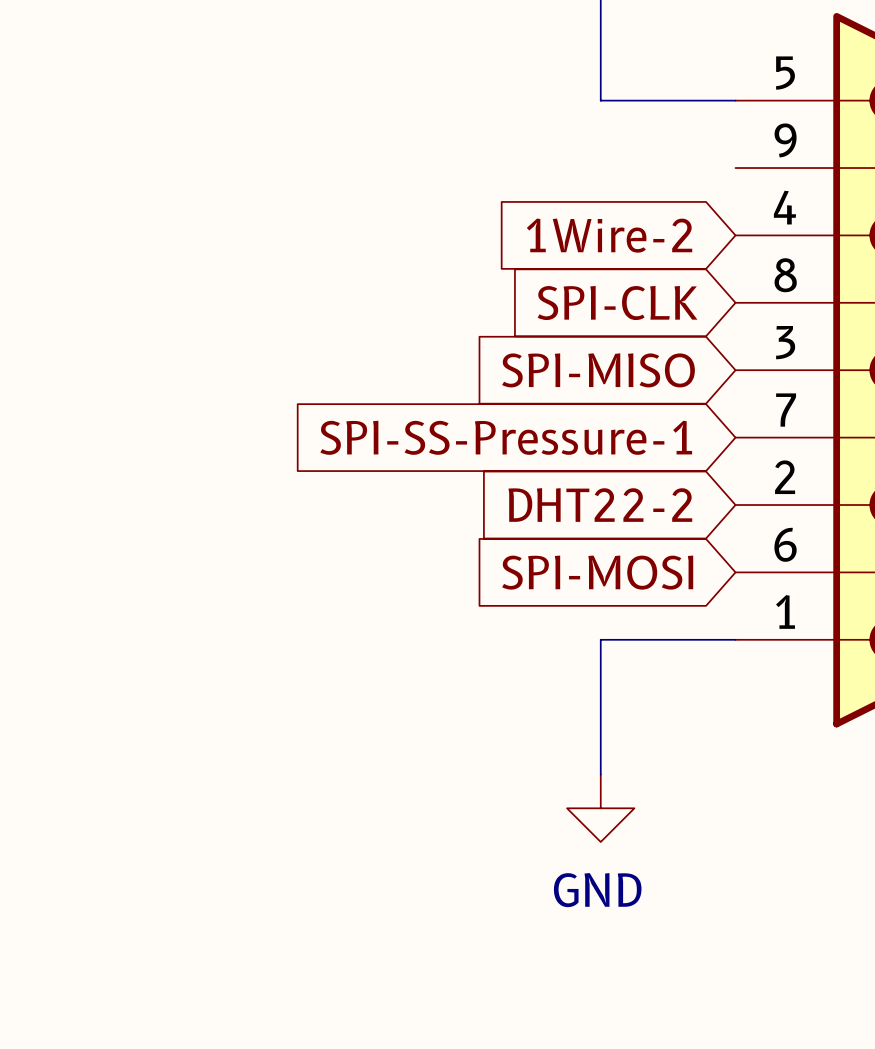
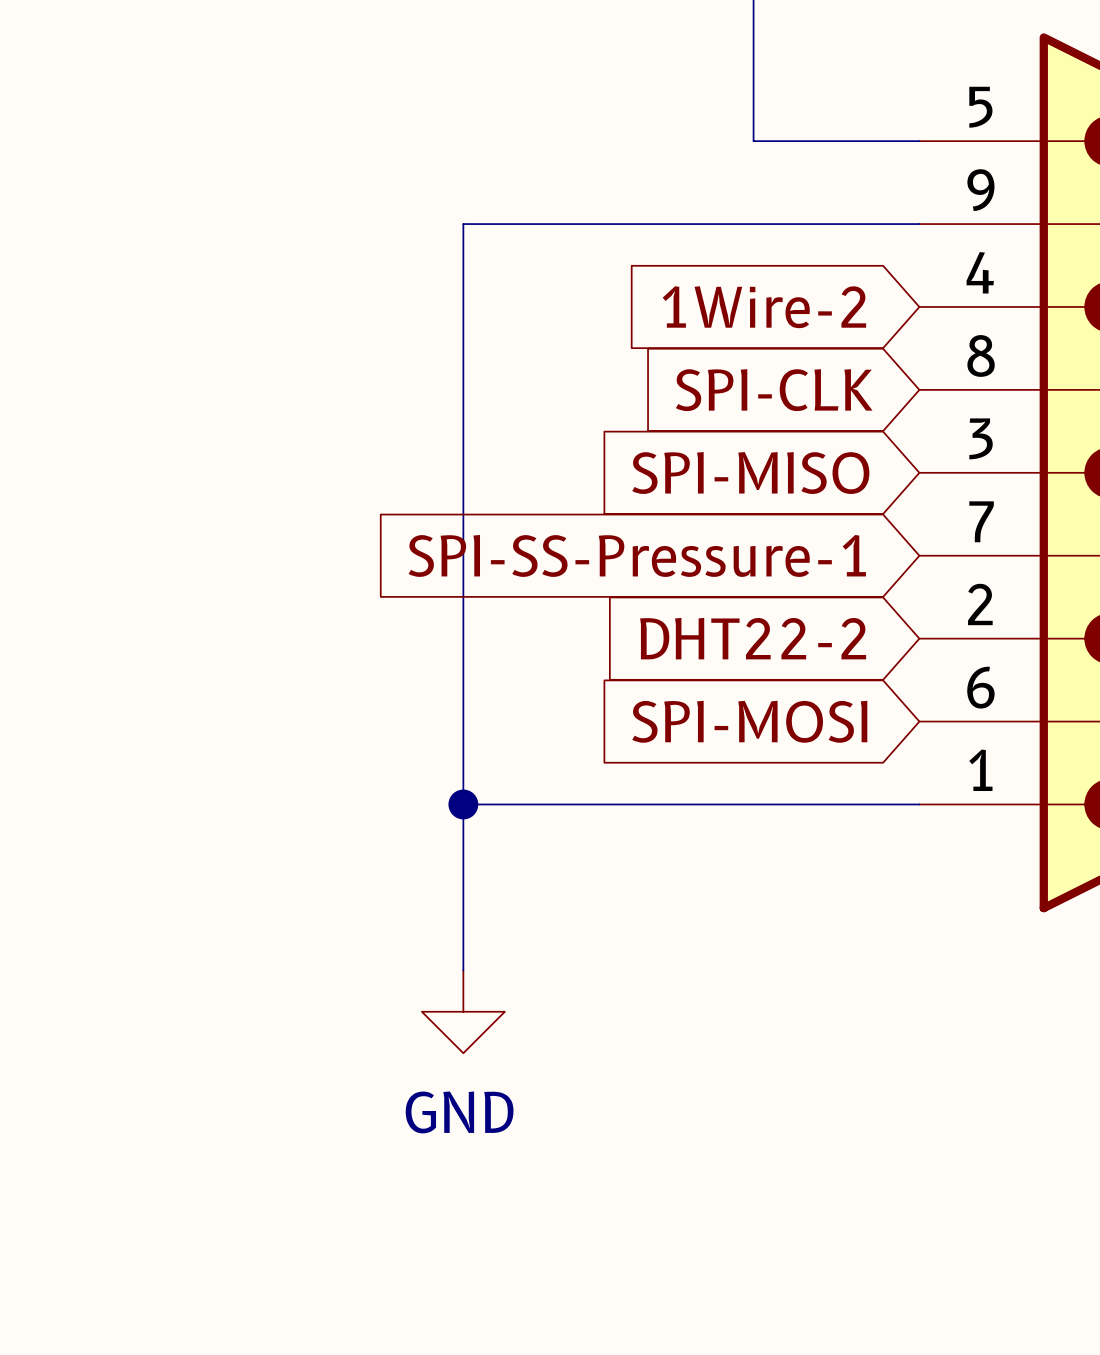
wire: none -> (919, 224) (463, 224) (463, 970)
junction: none -> (463, 804)
wire: (600, 639) (600, 774) -> (753, 804) (463, 804)
power symbol position: GND (600, 808) -> GND (463, 1011)

